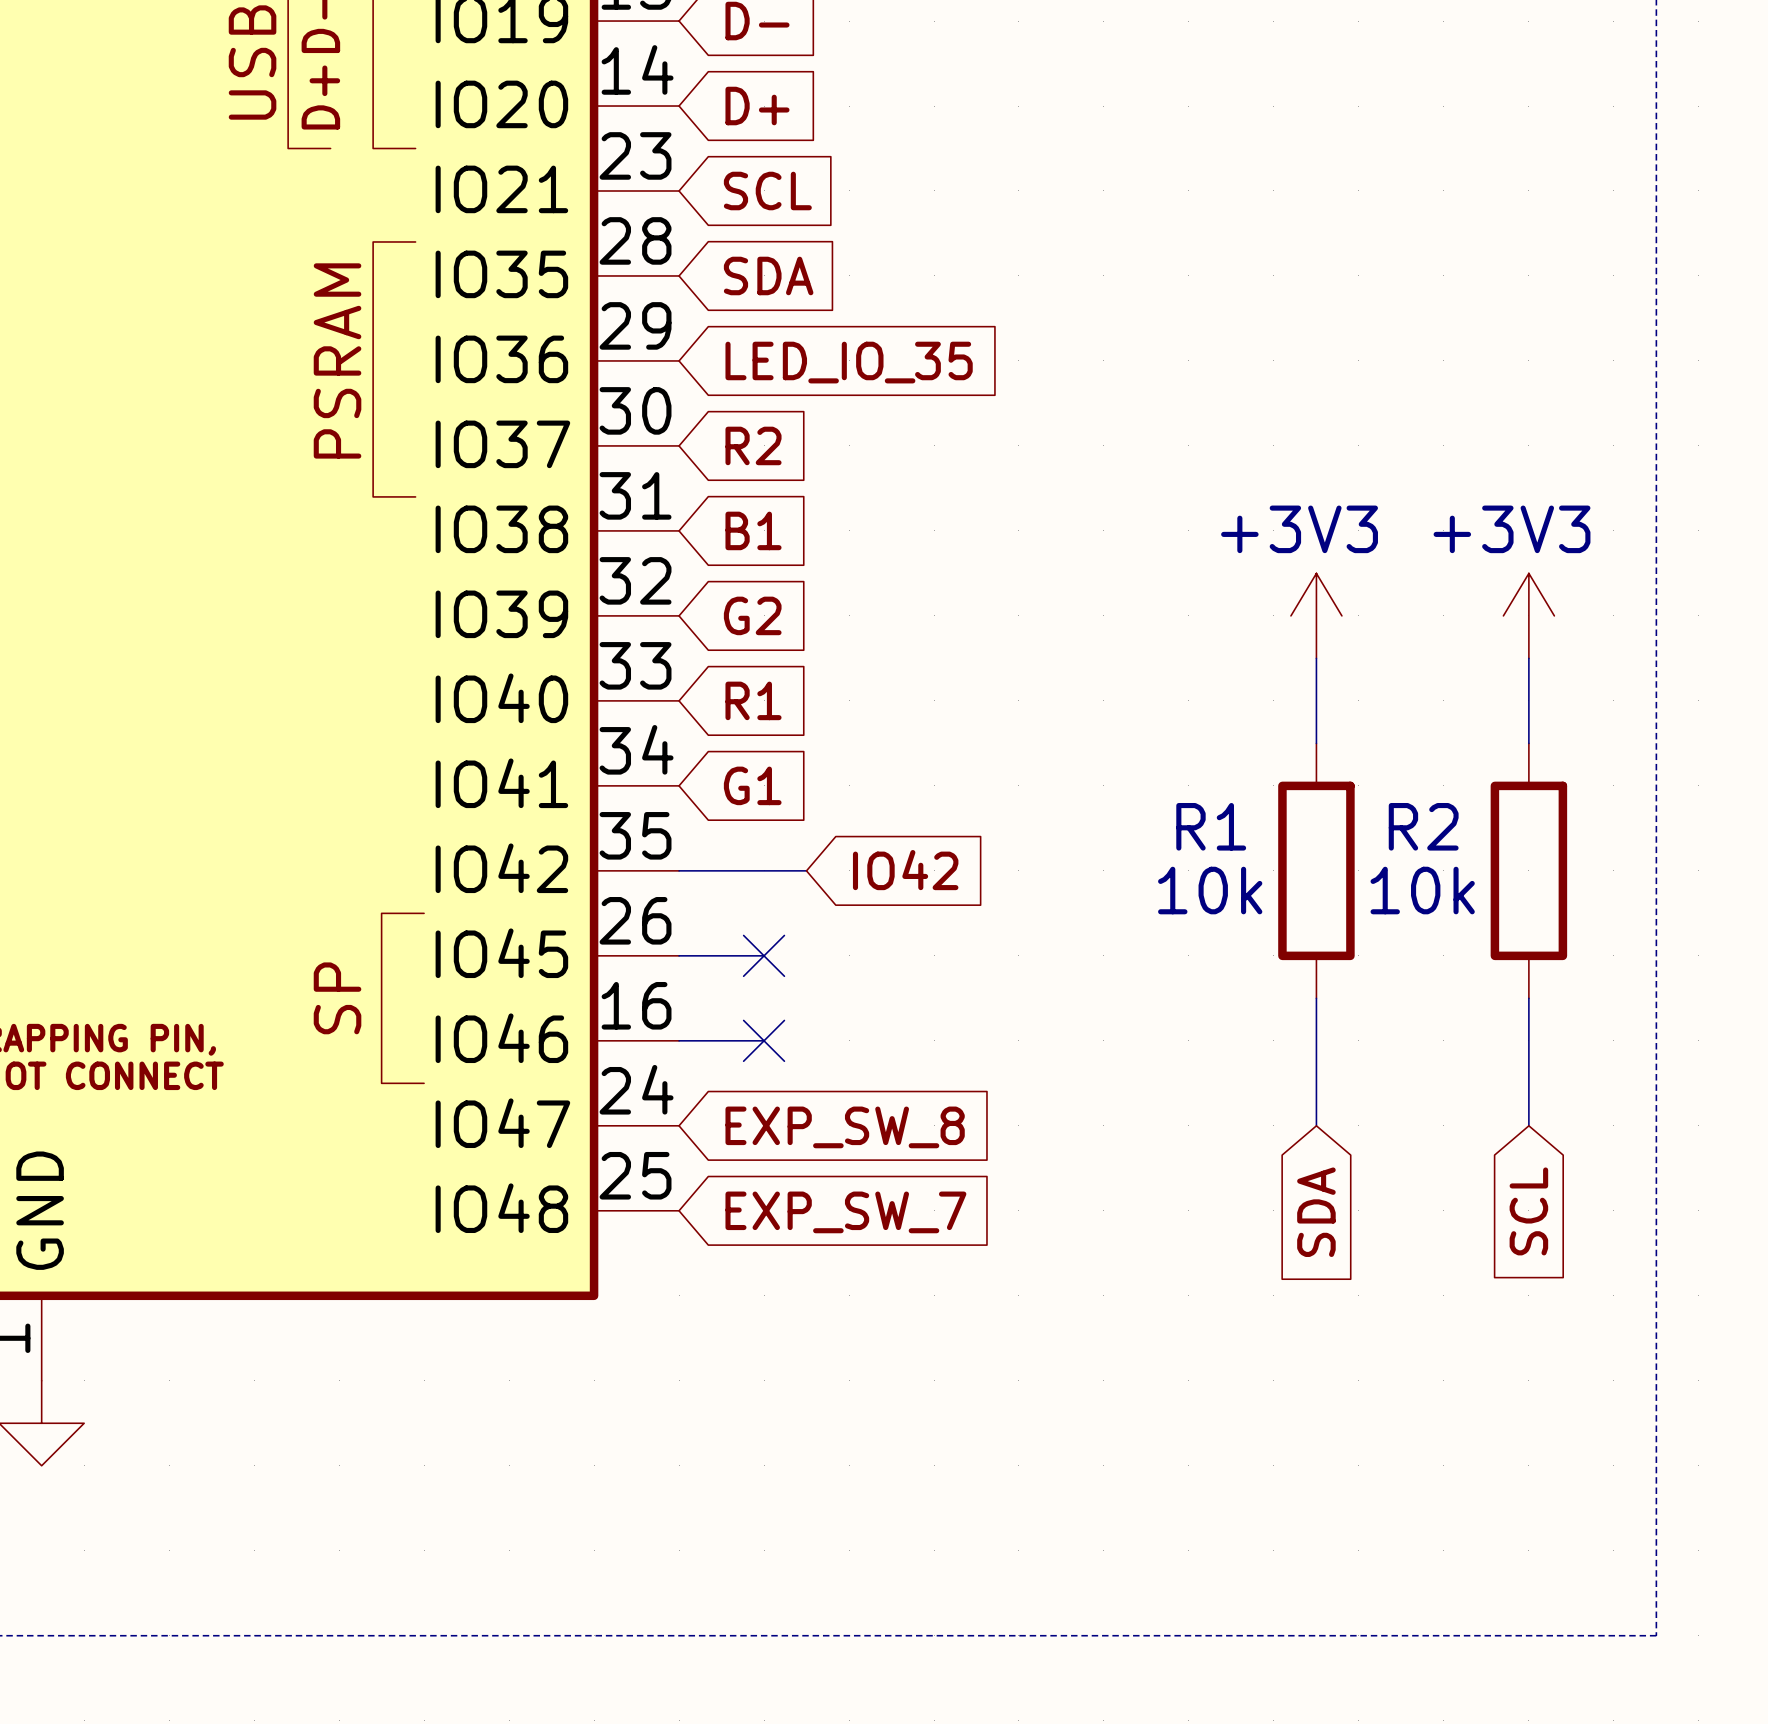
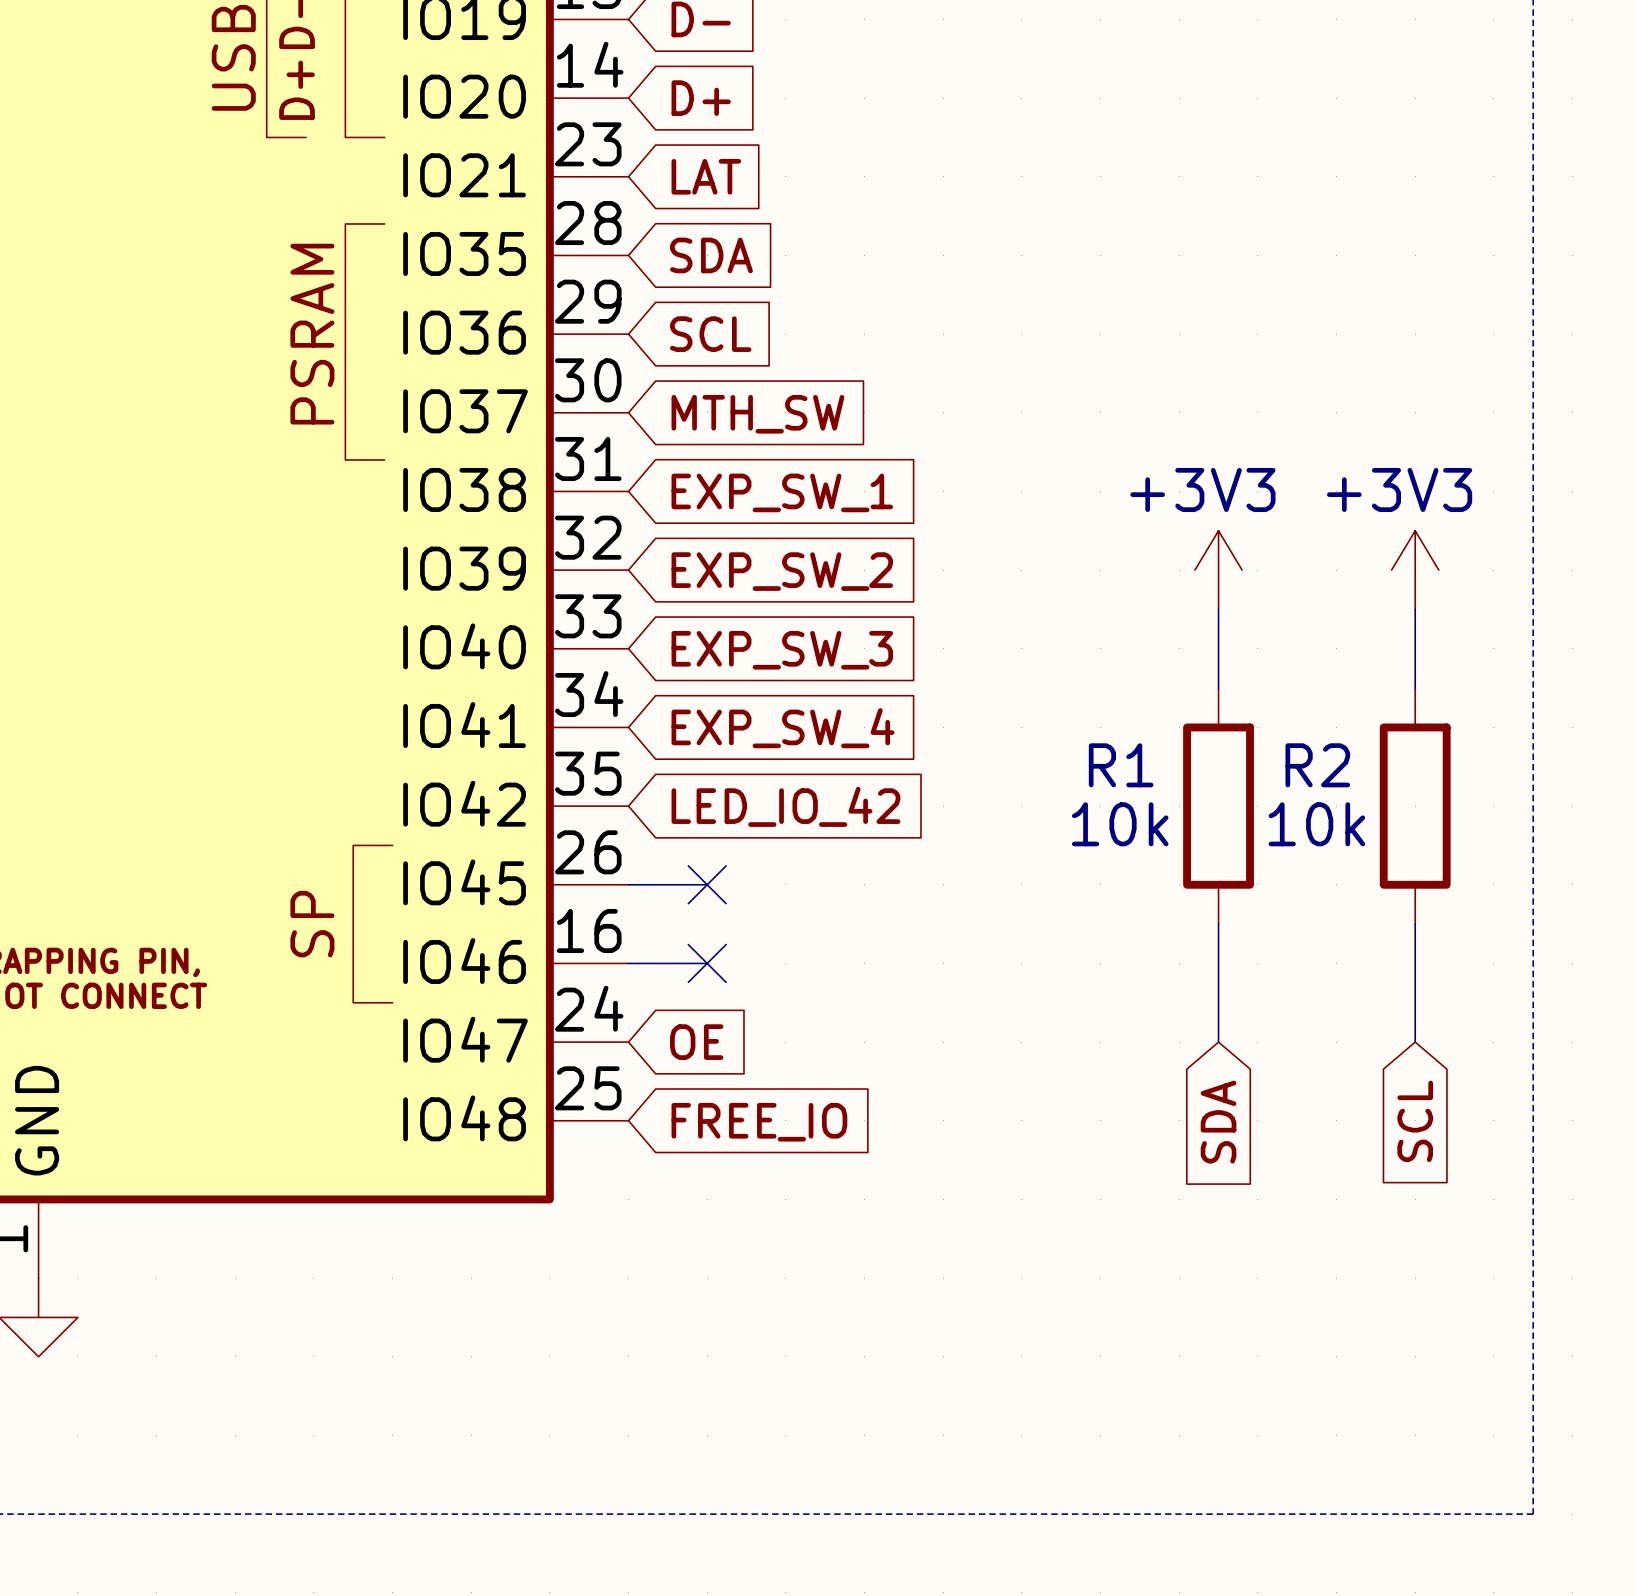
global label: SCL (767, 190) -> LAT (706, 176)
global label: LED_IO_35 (849, 362) -> SCL (710, 334)
global label: R2 (753, 445) -> MTH_SW (757, 414)
global label: B1 (753, 530) -> EXP_SW_1 (782, 492)
global label: G2 (752, 615) -> EXP_SW_2 (782, 571)
global label: R1 (753, 700) -> EXP_SW_3 (782, 650)
global label: G1 (752, 785) -> EXP_SW_4 (783, 728)
wire: (679, 870) (806, 870) -> none
global label: IO42 (905, 870) -> LED_IO_42 (785, 806)
global label: EXP_SW_8 (845, 1127) -> OE (696, 1042)
global label: EXP_SW_7 (845, 1212) -> FREE_IO (759, 1122)

